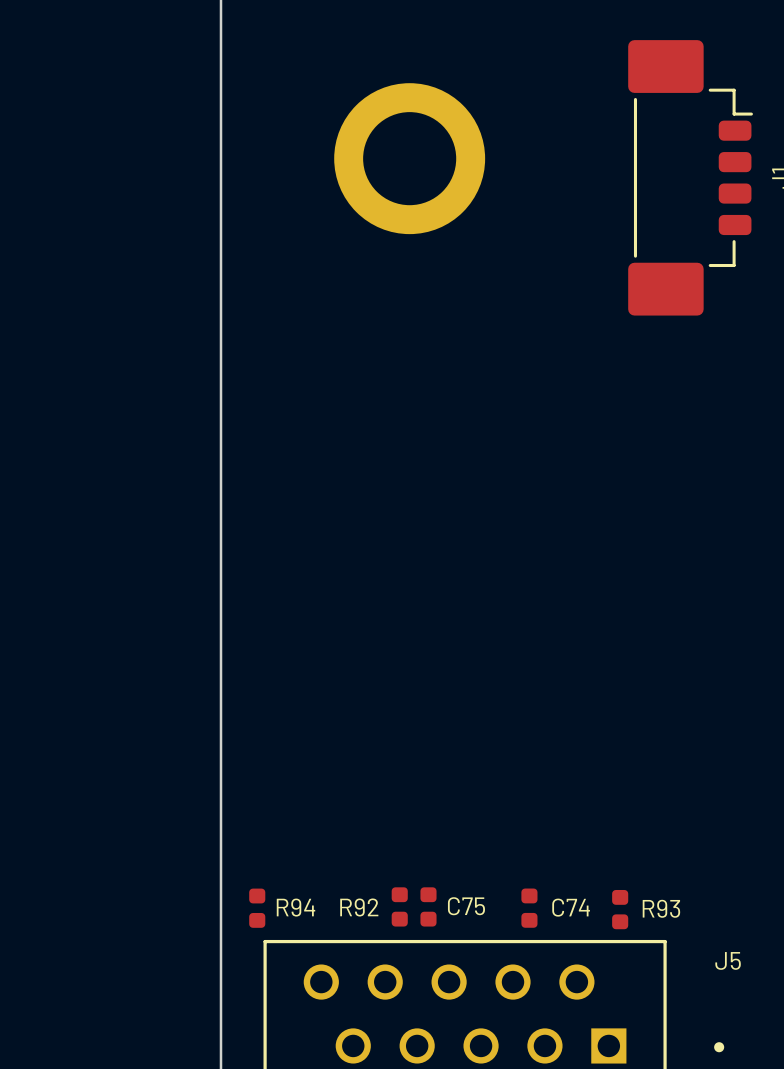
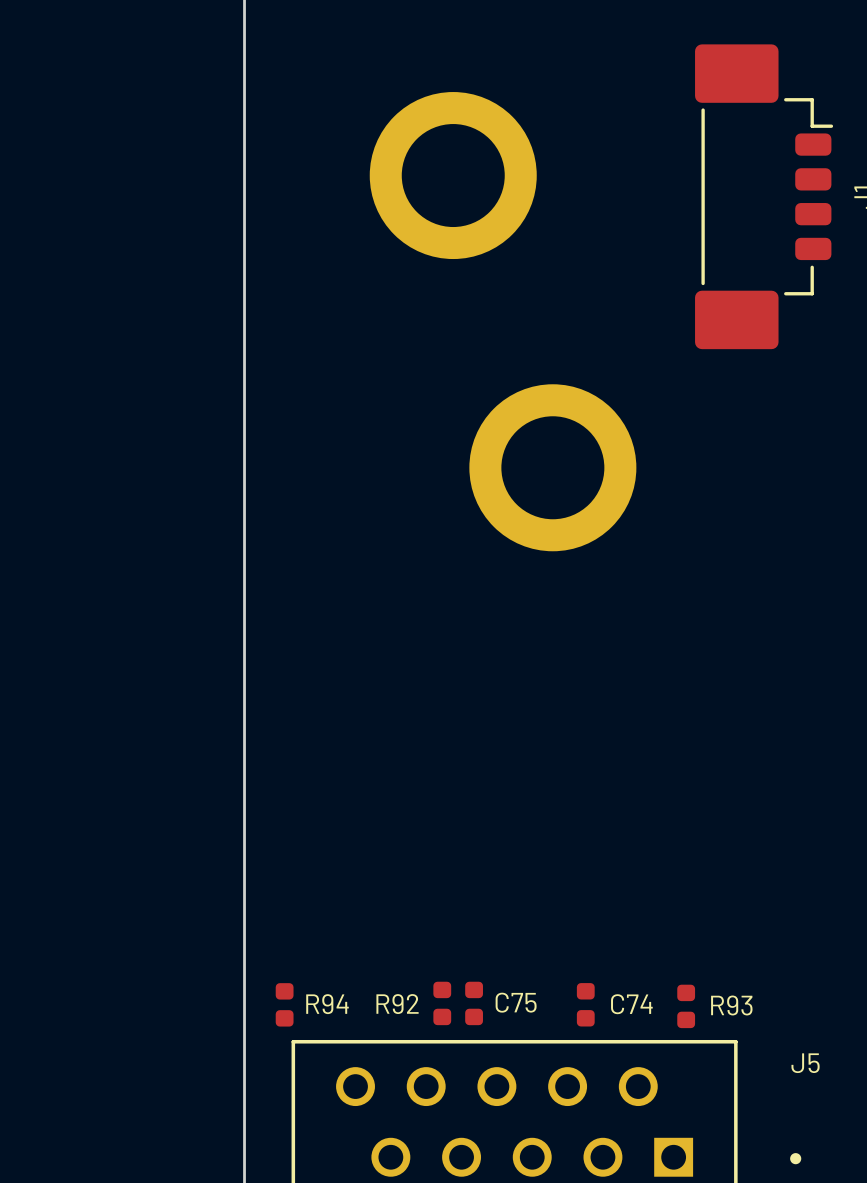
part: none -> (552, 467)

